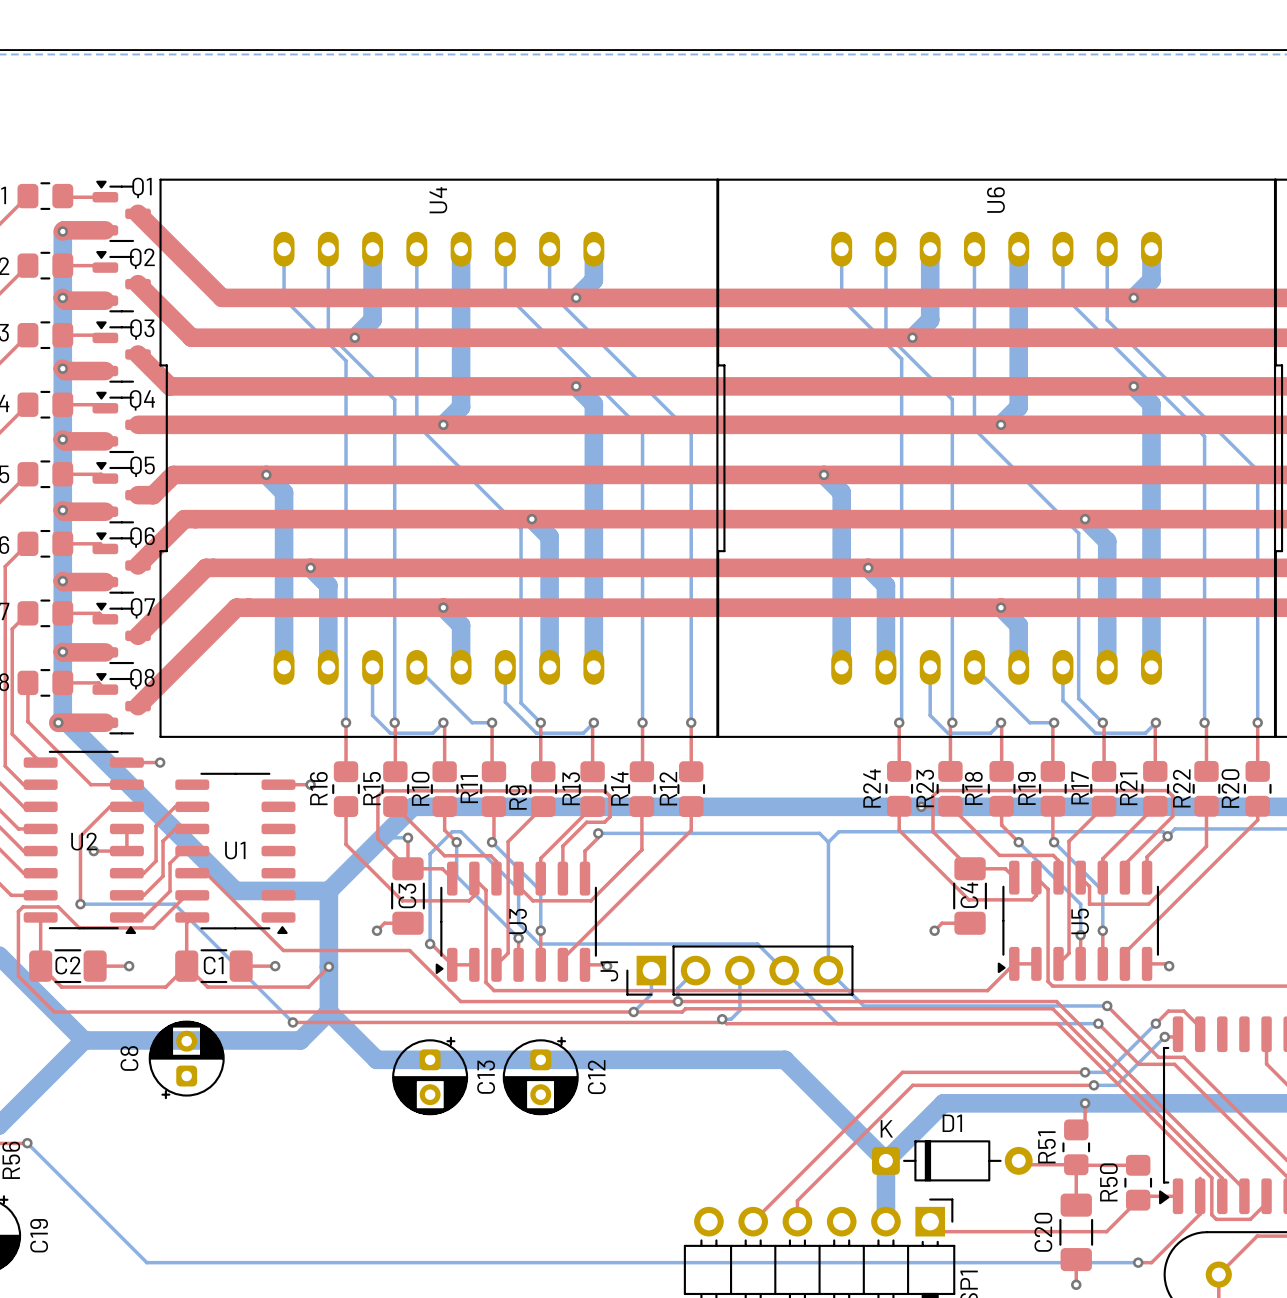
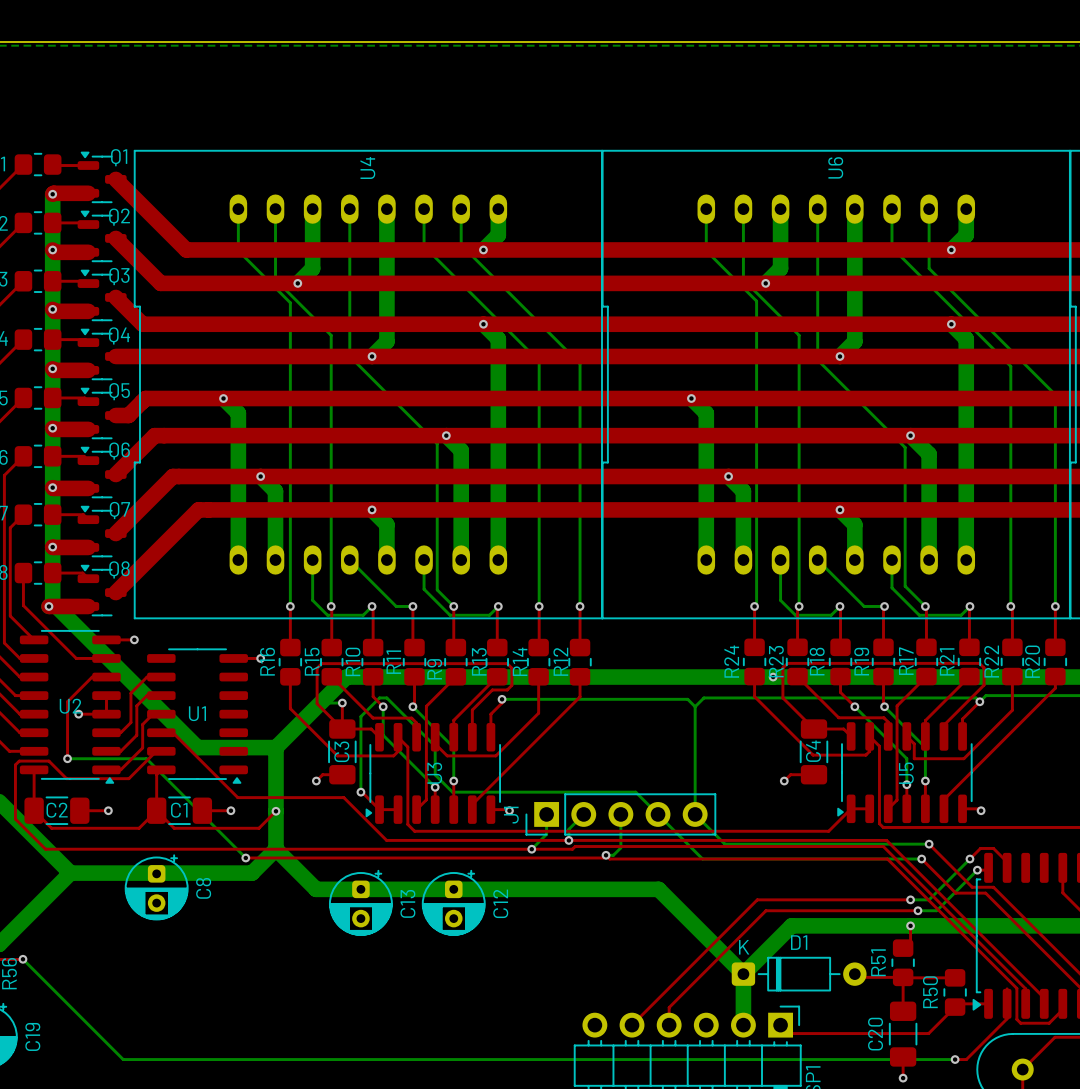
C8 rotation: 0° (186, 1059) -> 180° (156, 887)

